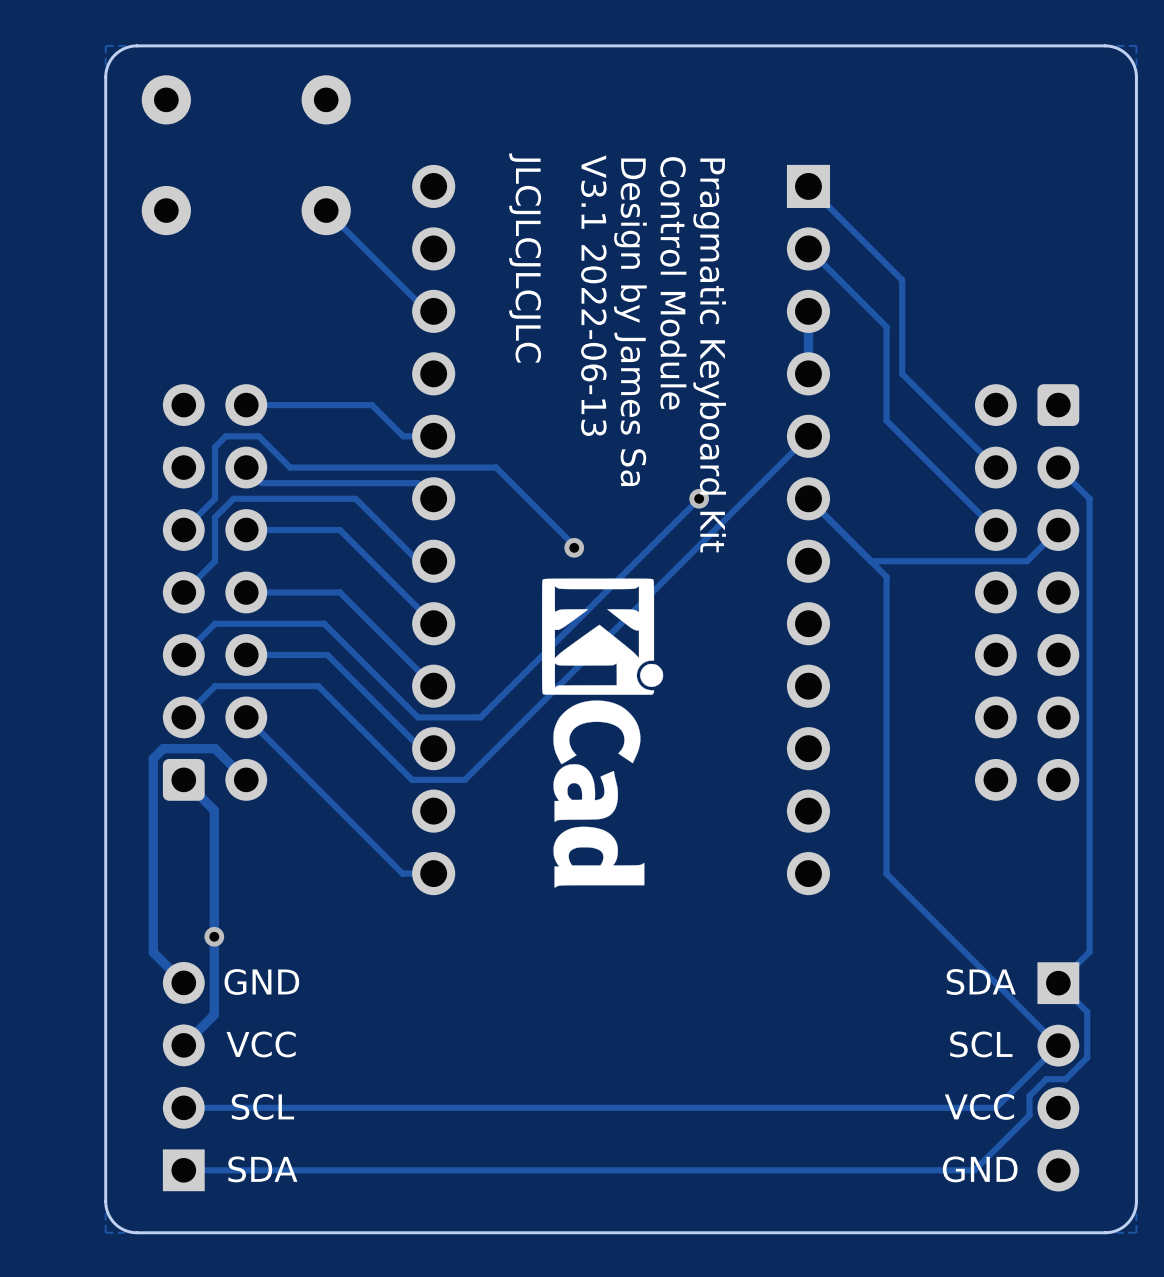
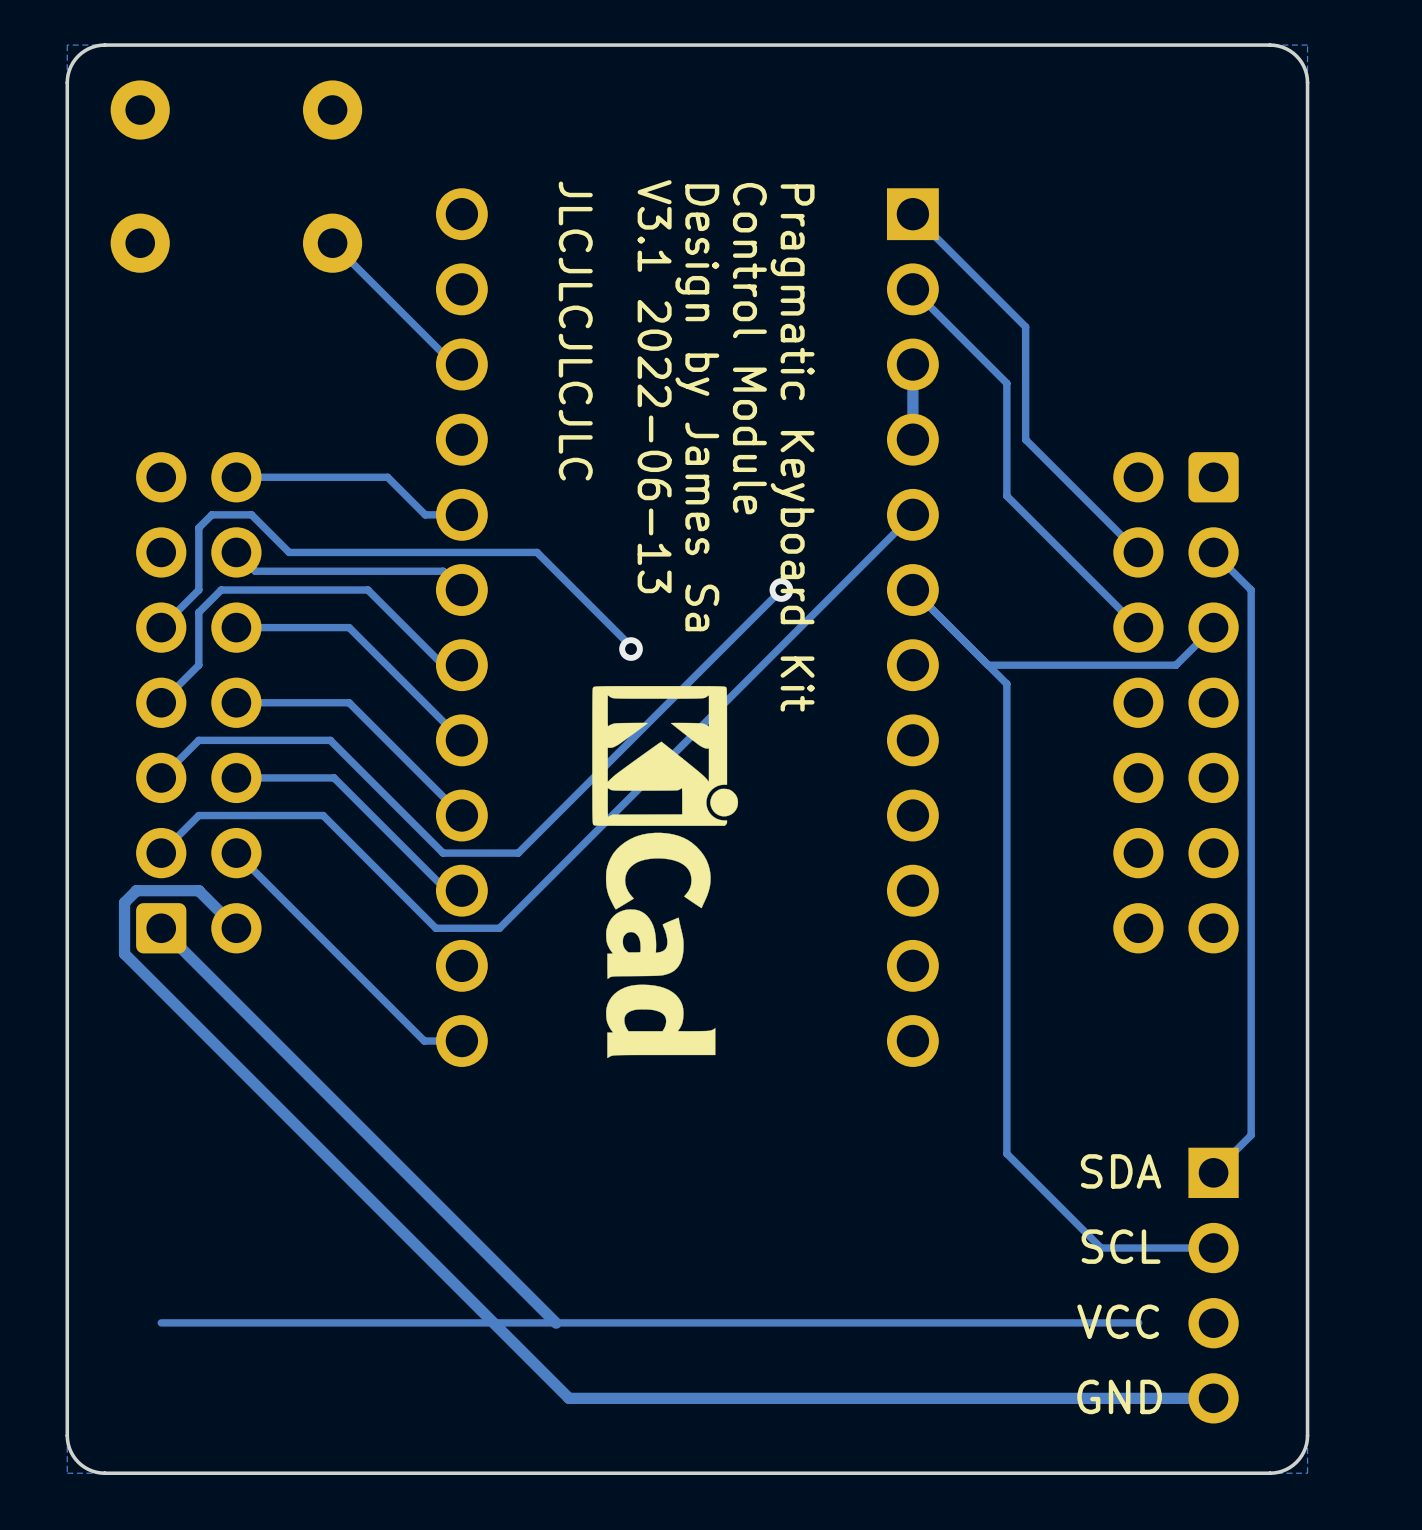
track: (153, 801) (153, 952) (183, 982) -> (124, 953) (569, 1398) (1213, 1398)
track: (214, 810) (214, 1014) (183, 1045) -> (197, 964) (556, 1323)
track: (886, 873) (1058, 1045) (996, 1107) -> (1006, 1041) (1006, 1153) (1101, 1248) (1213, 1248)
via: (214, 936) -> none
text: GND (261, 981) -> none
track: (1058, 983) (1087, 1012) (1087, 1057) (1065, 1079) (1046, 1079) (1029, 1096) (1029, 1115) (974, 1170) (183, 1170) -> none
text: VCC (261, 1044) -> none
part: (183, 1076) -> none
text: SCL (262, 1106) -> none
text: SDA (262, 1169) -> none

